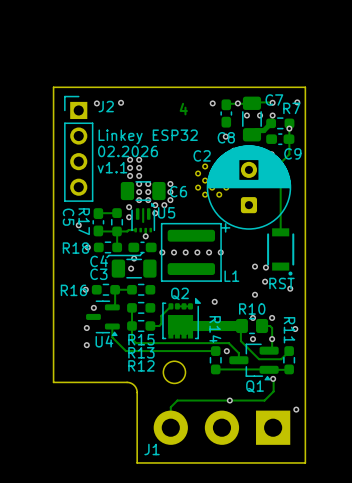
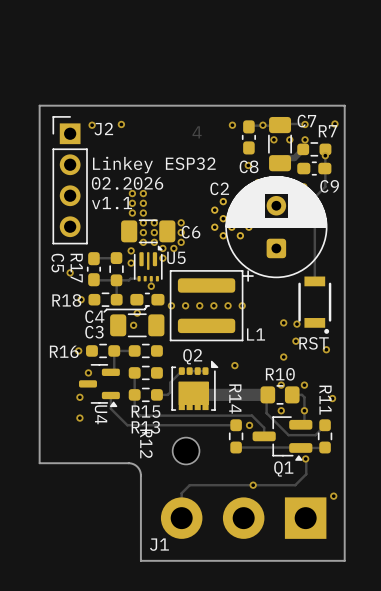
U4 name rotation: 0° (104, 341) -> 90° clockwise (101, 414)
R12 name rotation: 0° (141, 365) -> 90° clockwise (146, 443)

